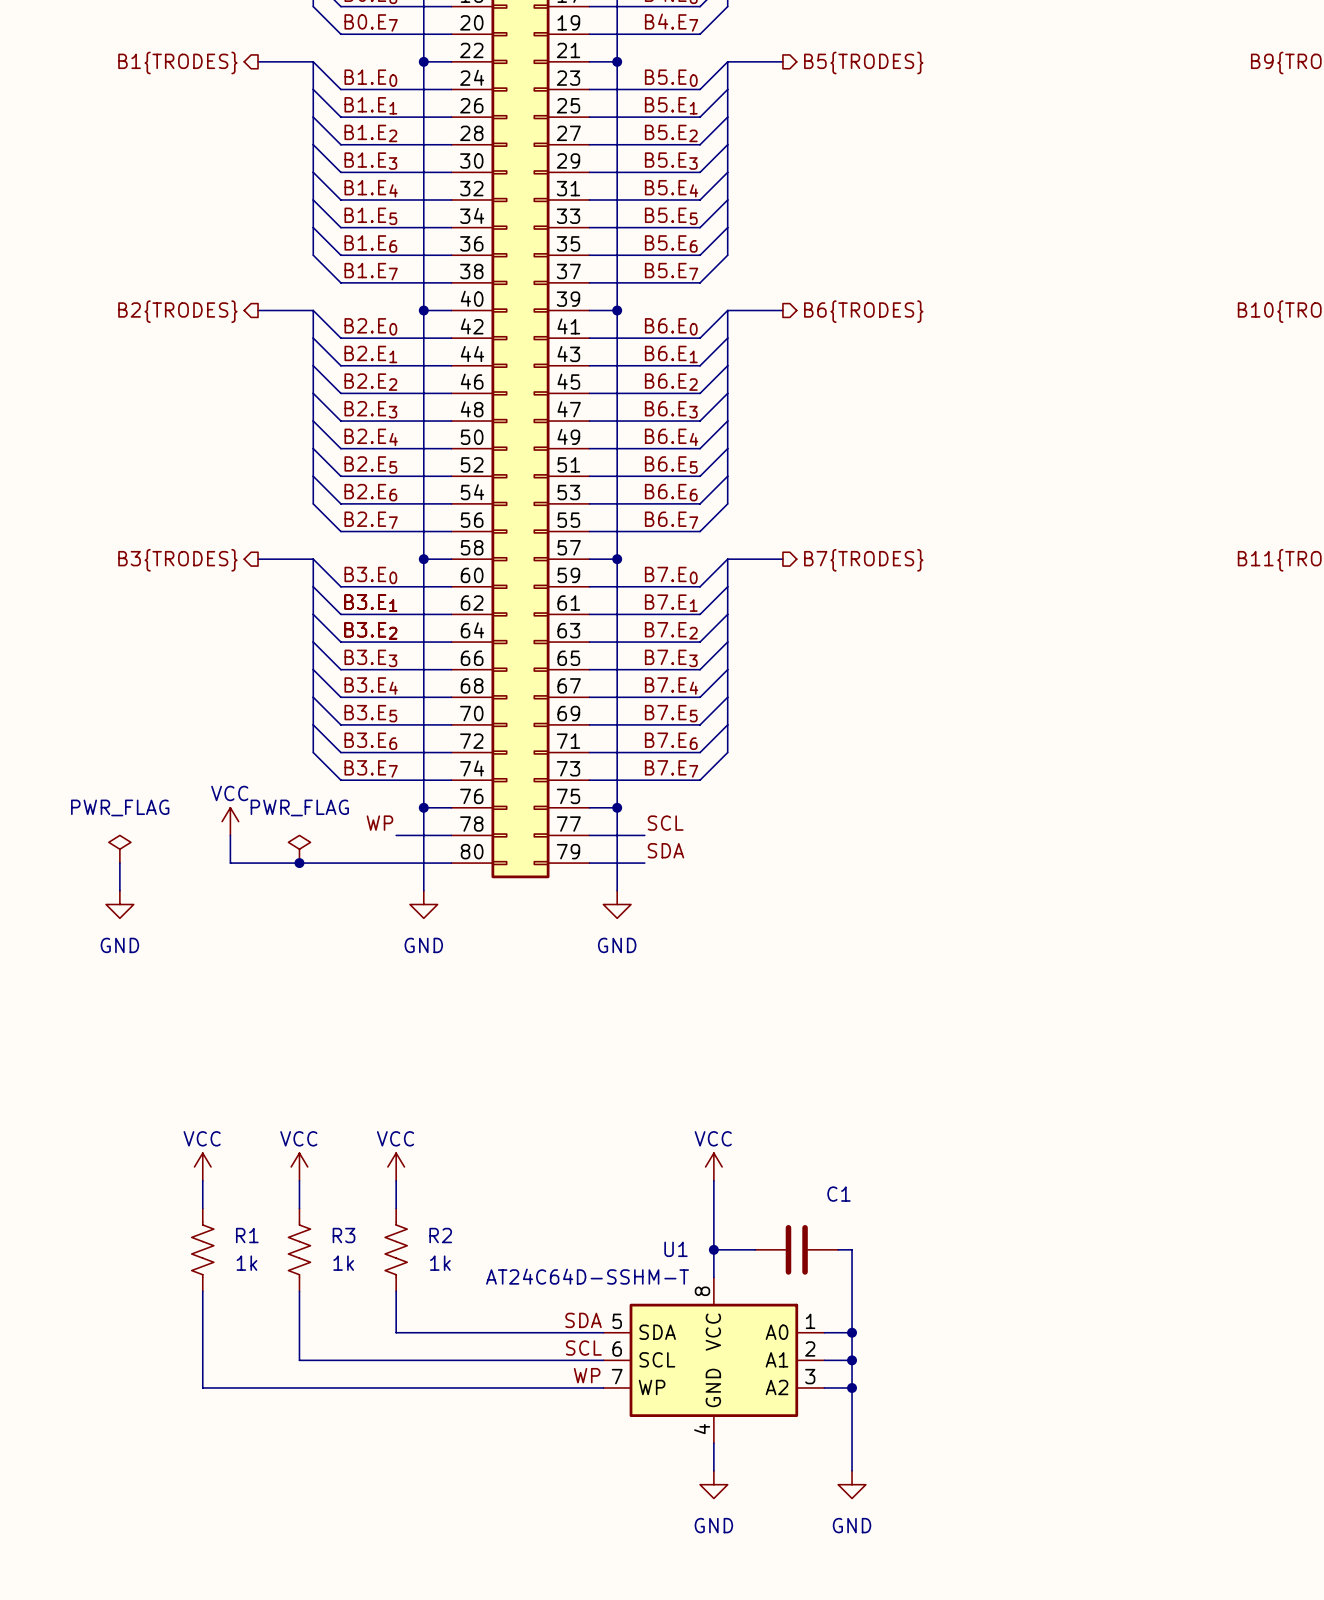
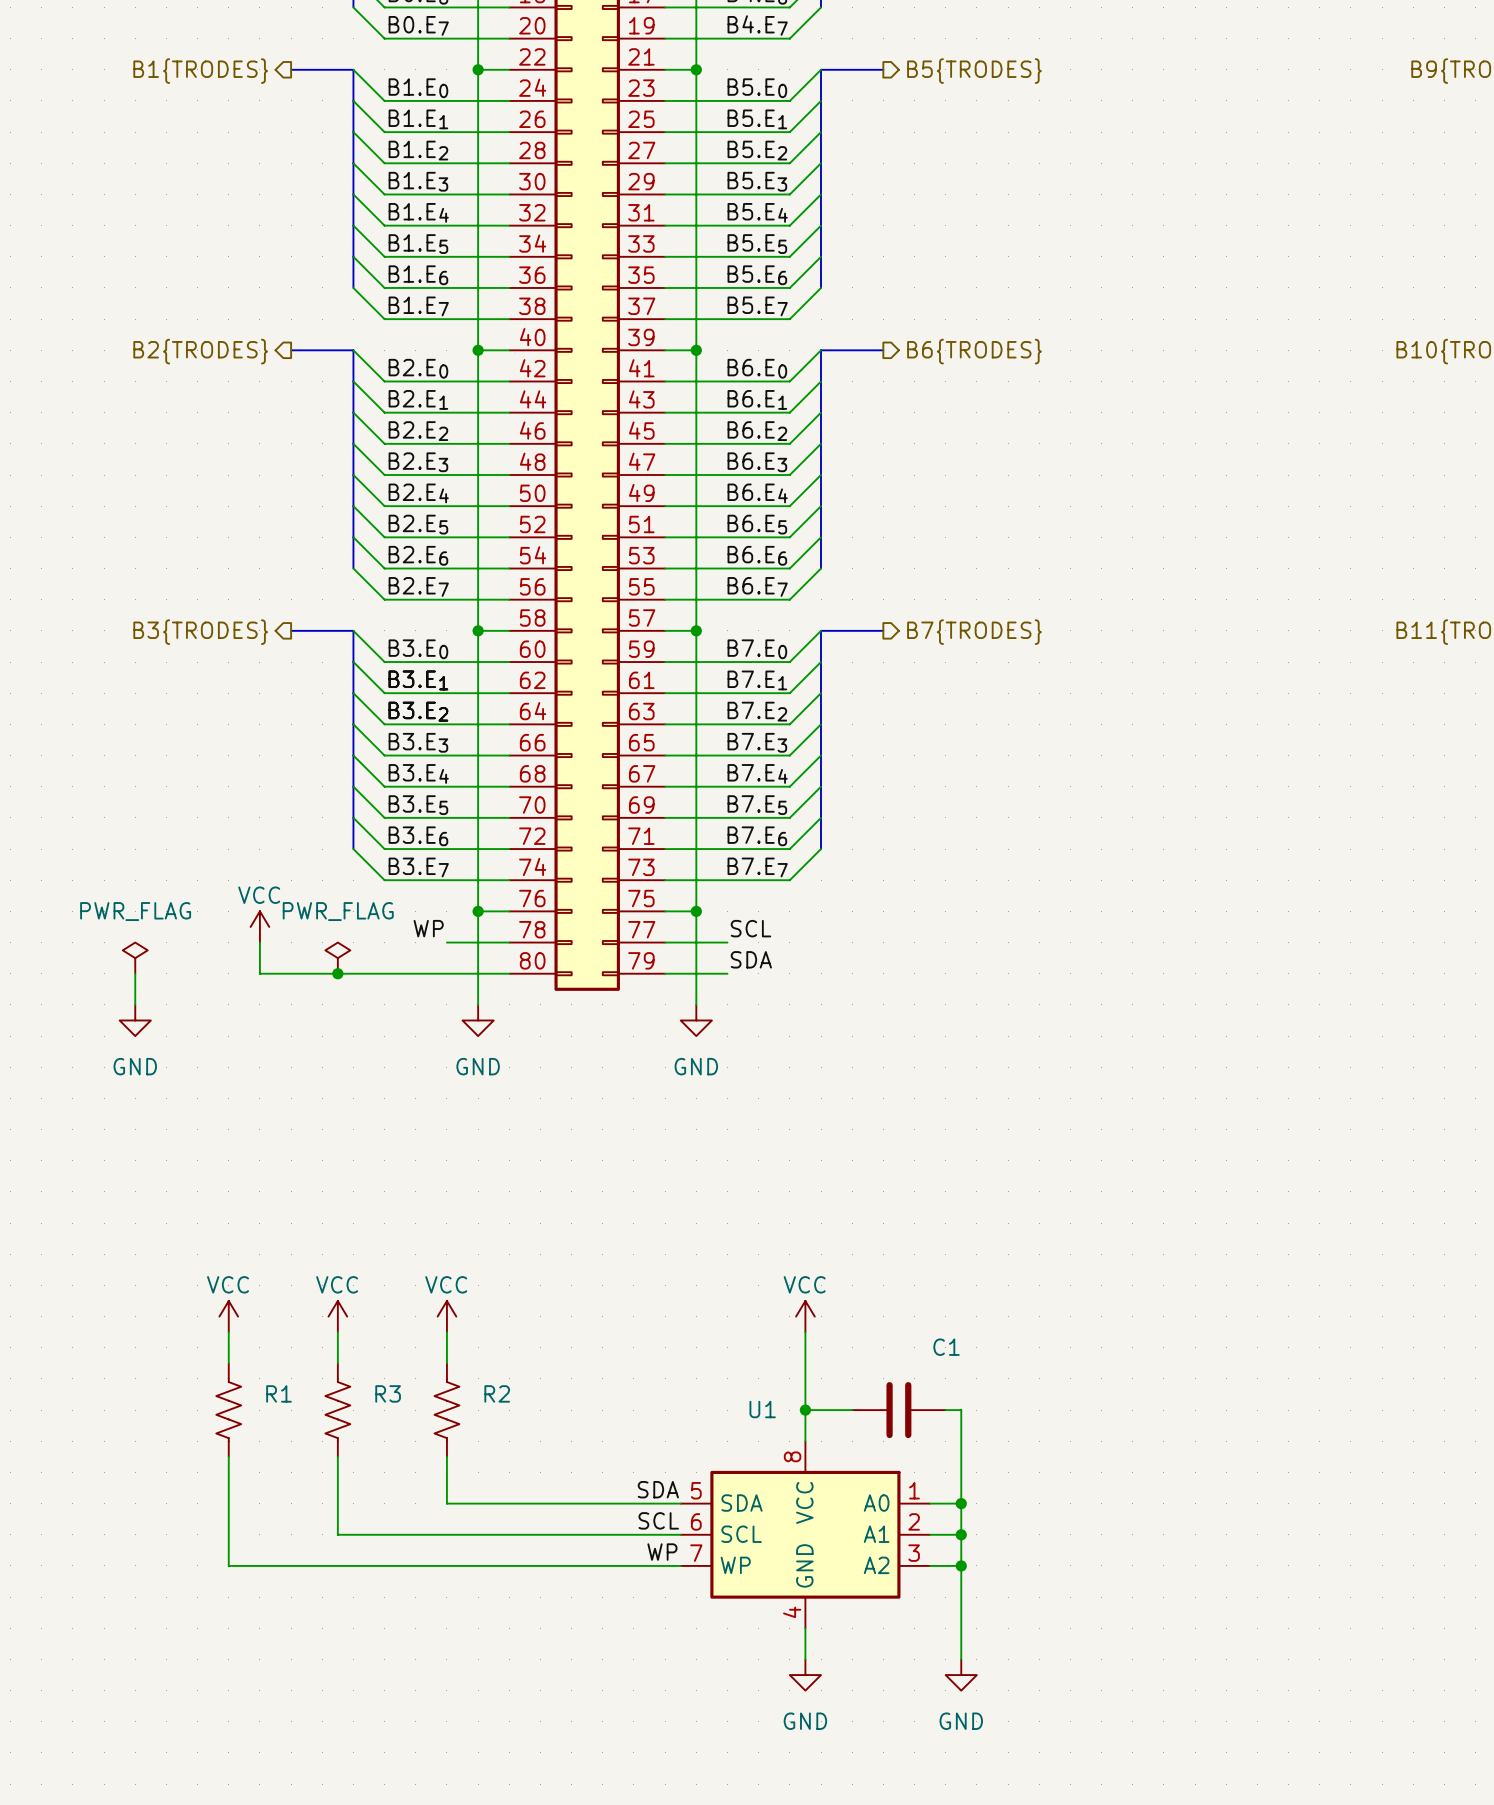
R1 value: 1k (246, 1263) -> none
R3 value: 1k (343, 1263) -> none
R2 value: 1k (440, 1263) -> none
U1 value: AT24C64D-SSHM-T (587, 1276) -> none

